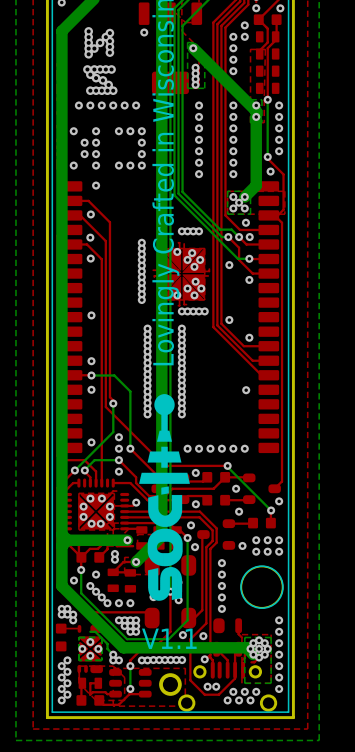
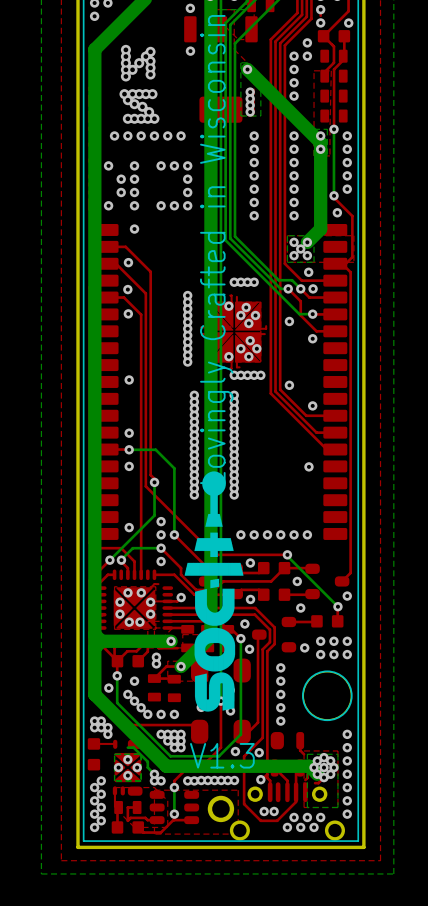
text: V1.1 (169, 638) -> V1.3 (222, 755)

